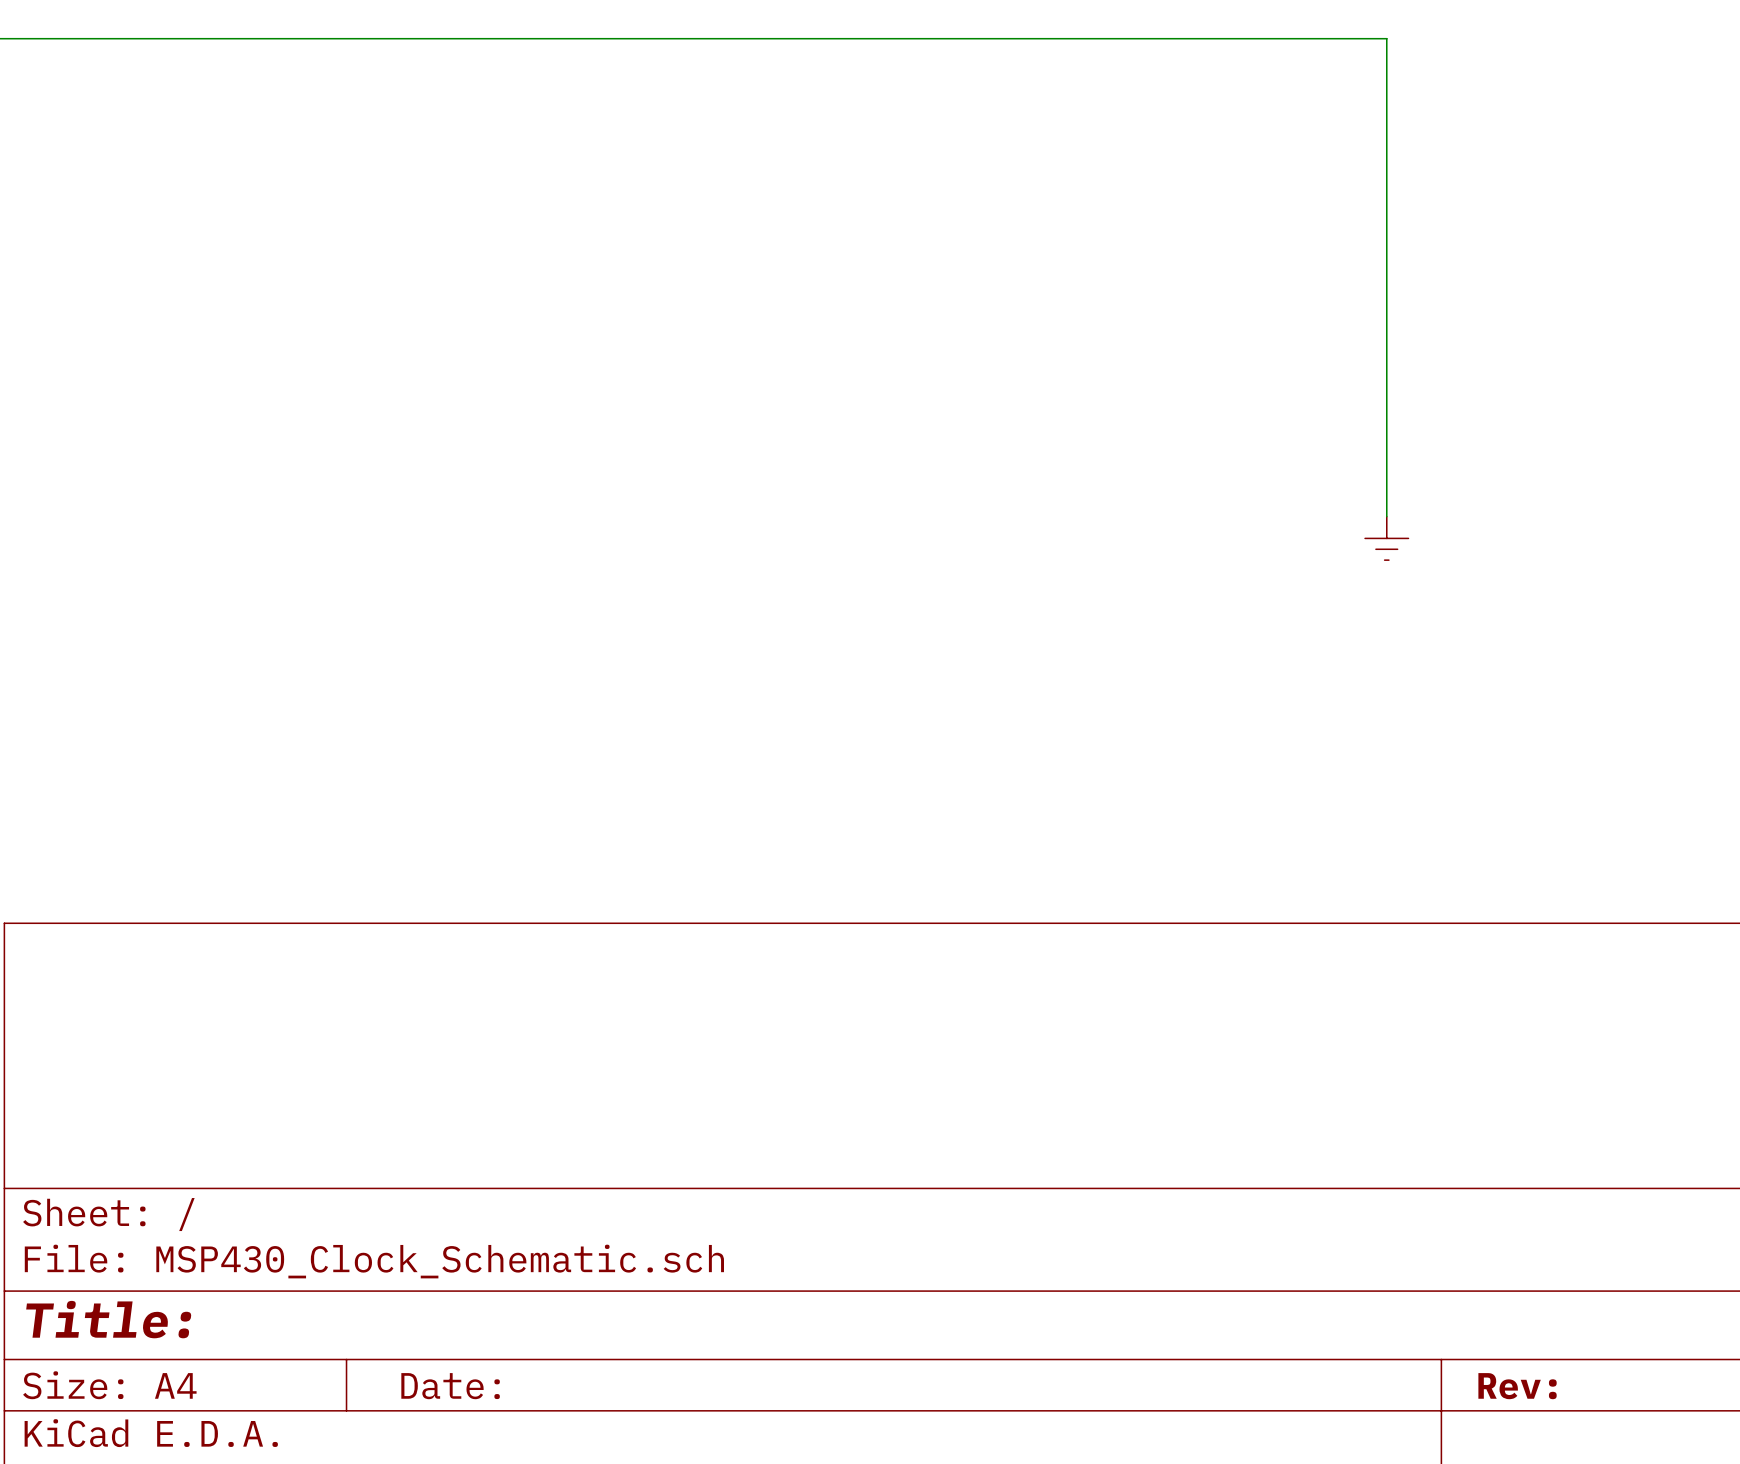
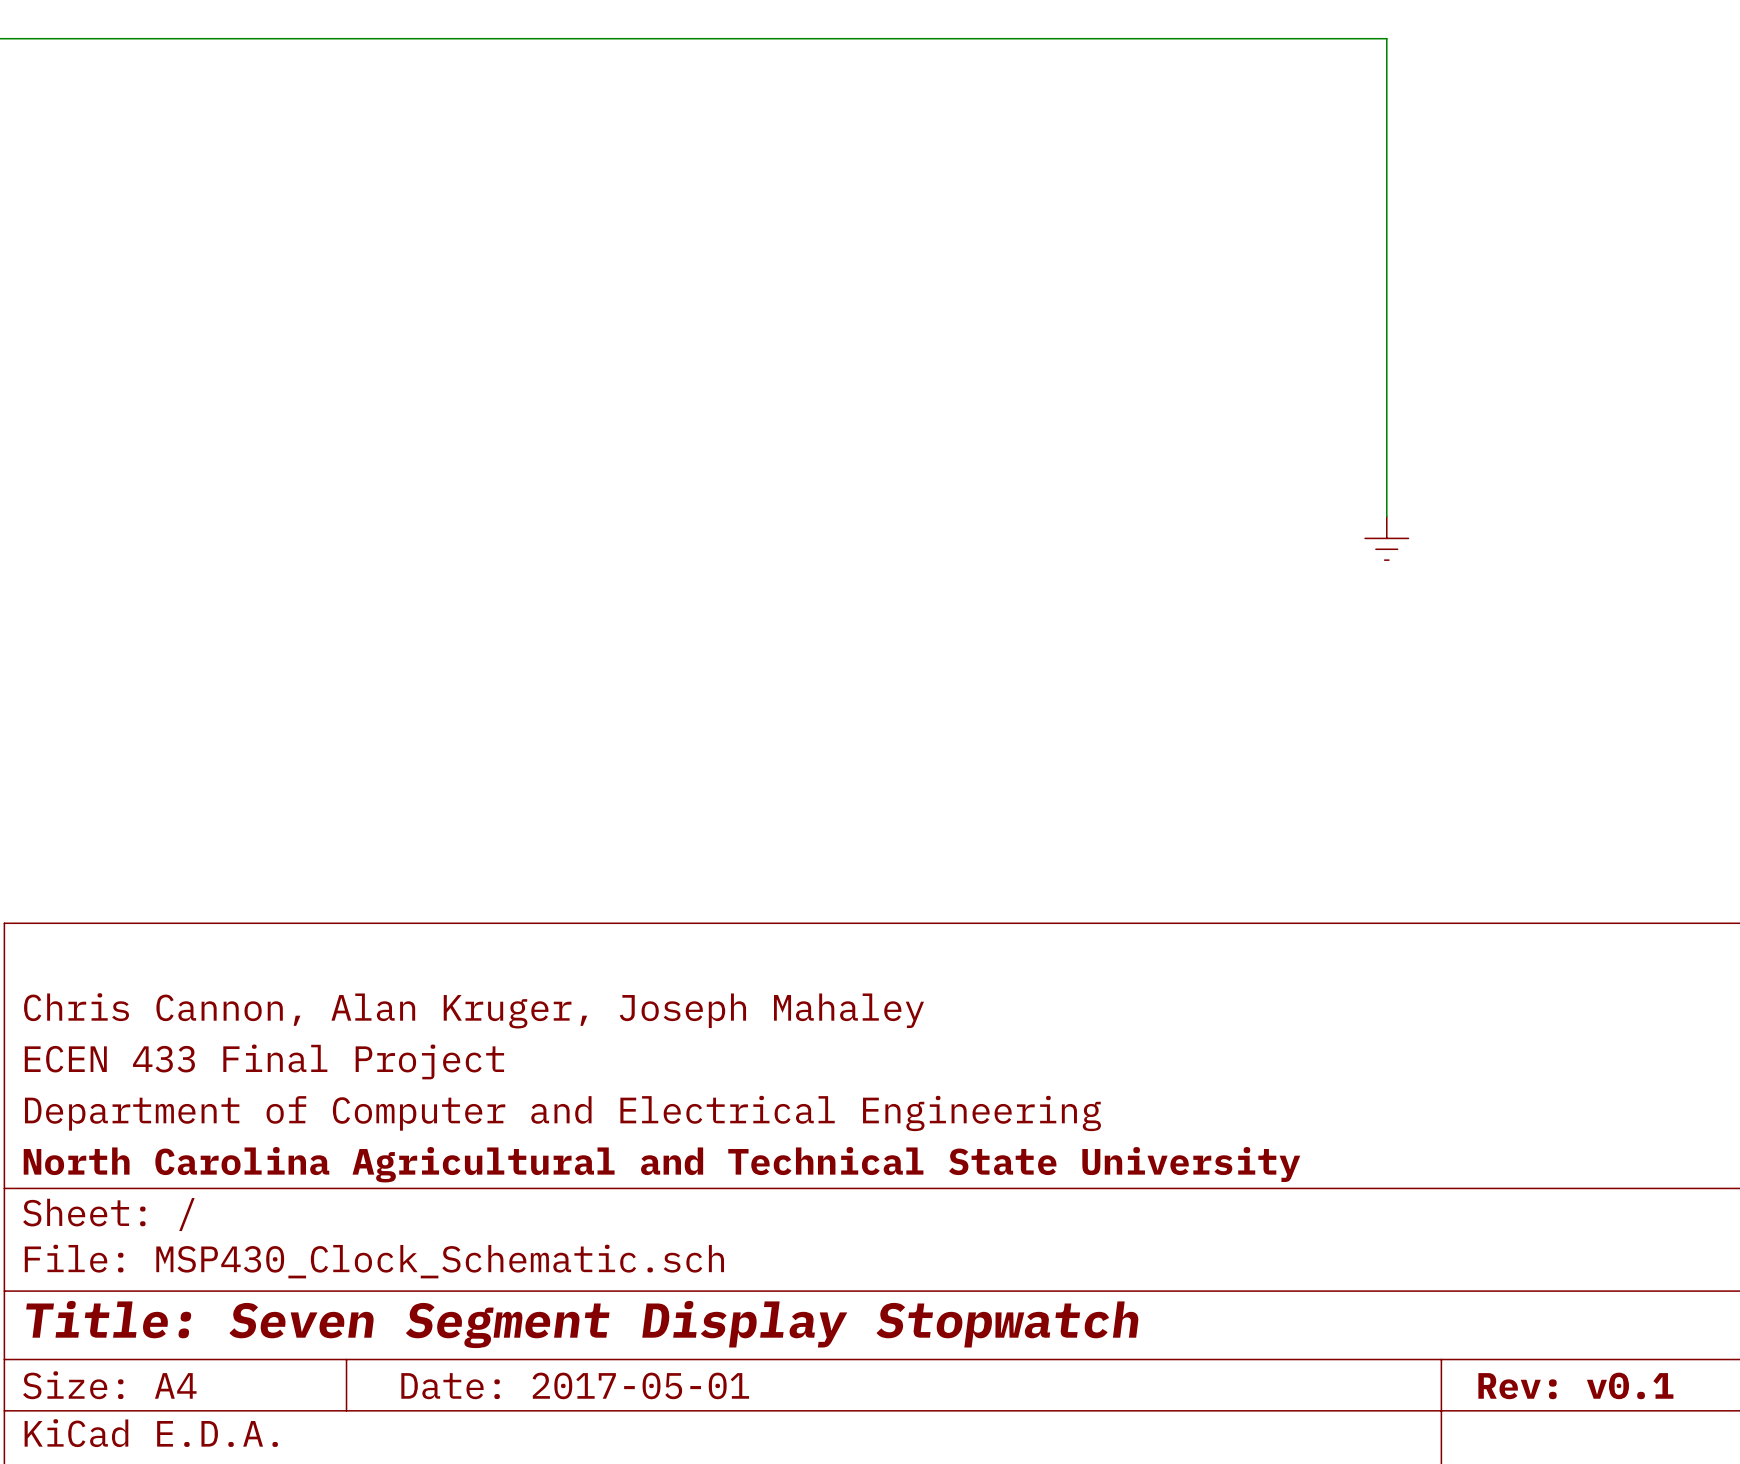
title block: none -> Chris Cannon, Alan Kruger, Joseph Mahaley (474, 1010)
title block: none -> ECEN 433 Final Project (264, 1061)
title block: none -> Department of Computer and Electrical Engineering (562, 1113)
title block: none -> North Carolina Agricultural and Technical State University (661, 1164)
title block: Title: (108, 1319) -> Title: Seven Segment Display Stopwatch (582, 1324)
title block: Date: (450, 1386) -> Date: 2017-05-01 (575, 1385)
title block: Rev: (1517, 1386) -> Rev: v0.1 (1575, 1385)

